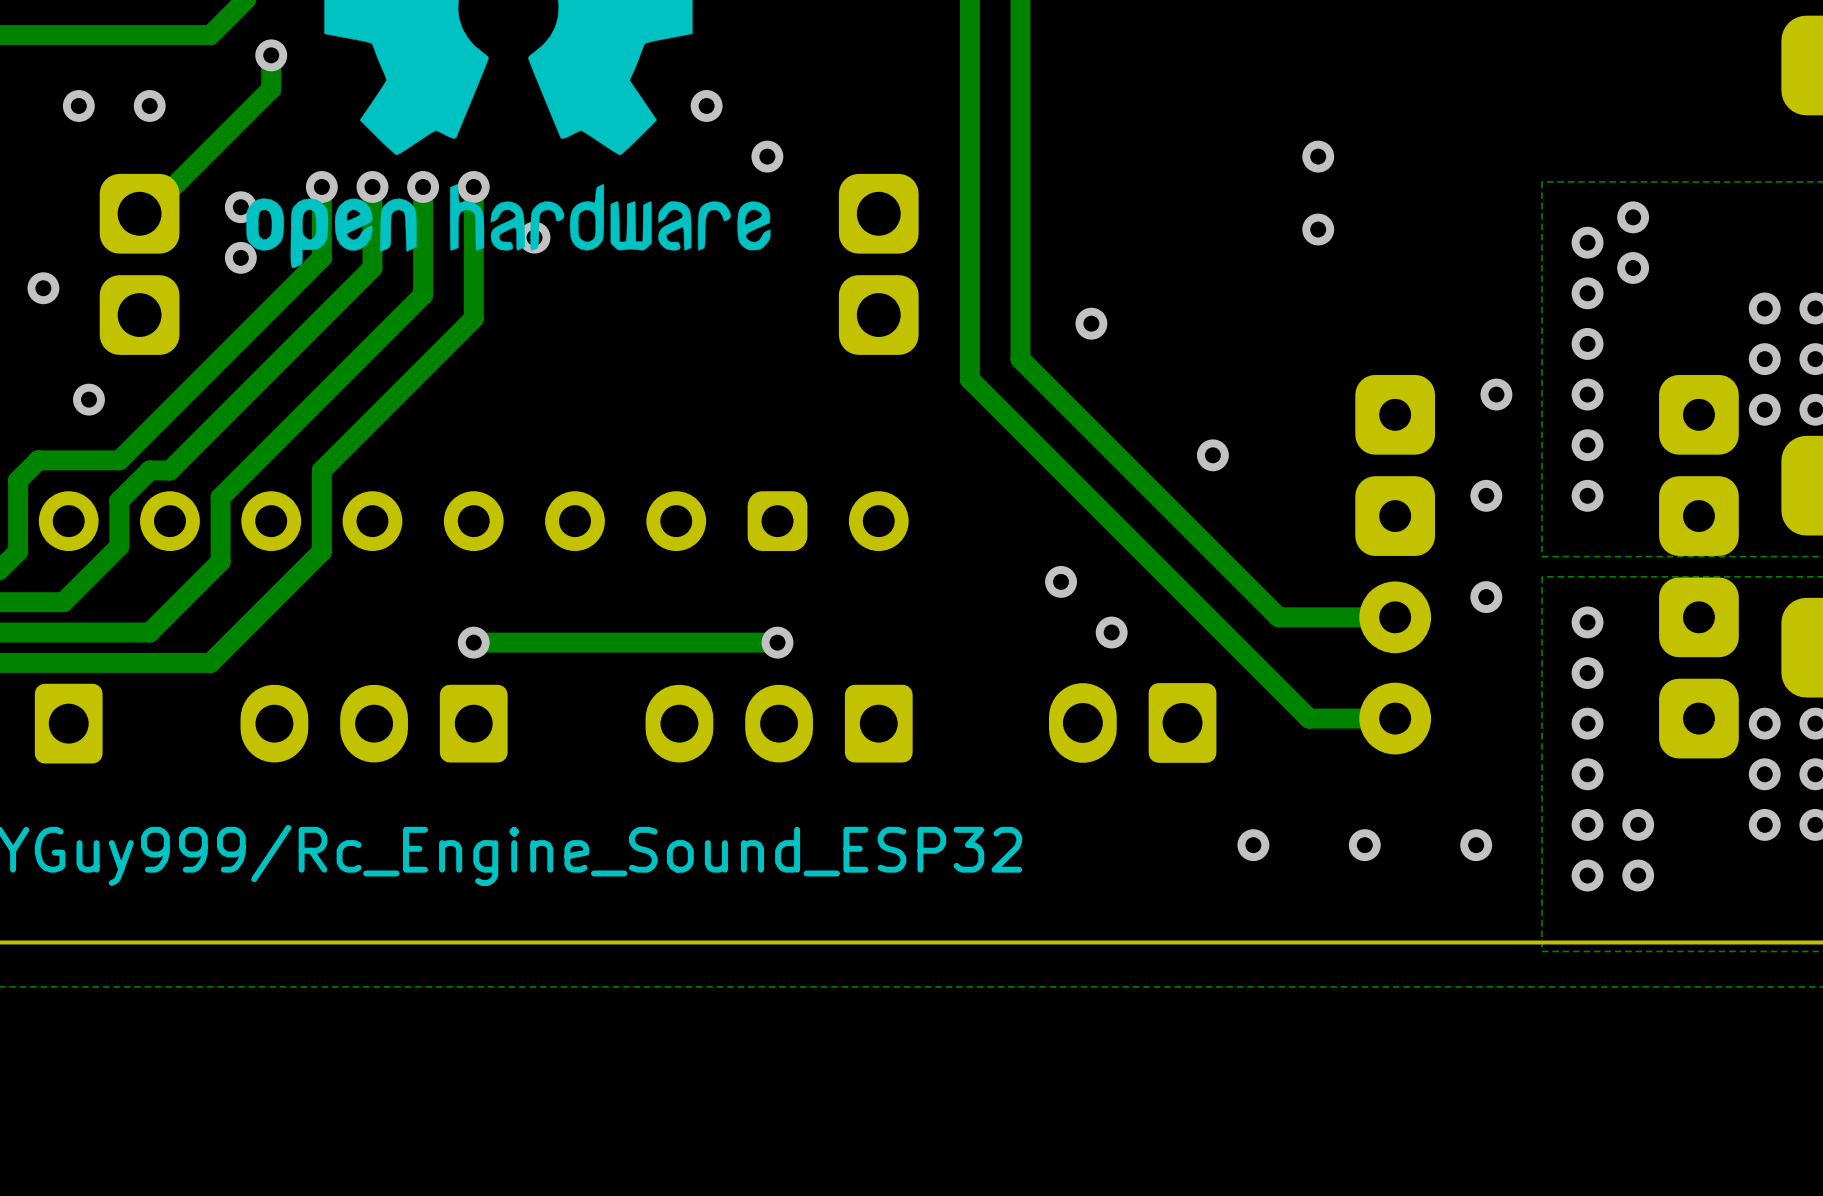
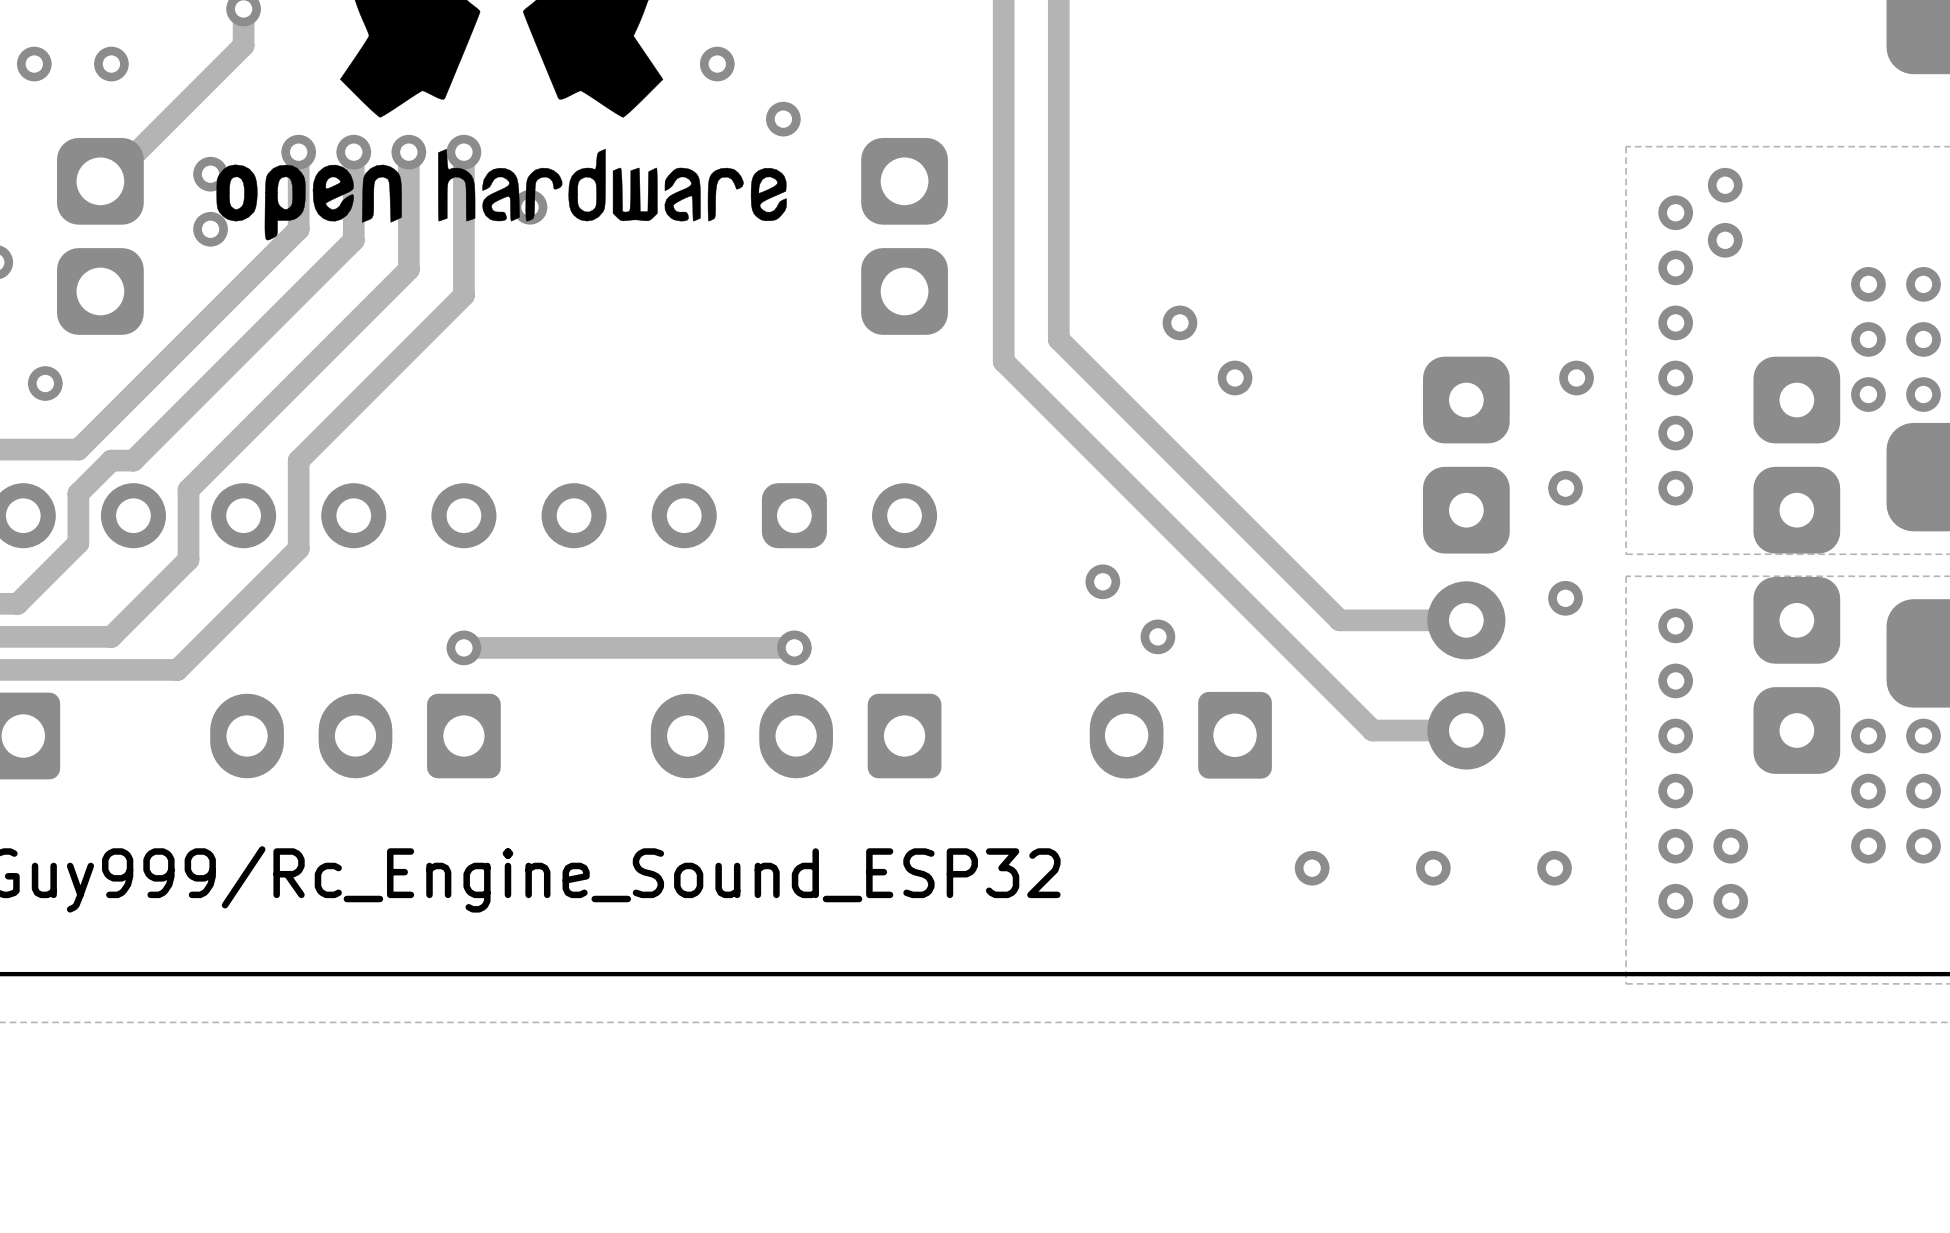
via: (1318, 156) -> none
via: (1318, 229) -> none
via position: (1091, 323) -> (1179, 322)
via: none -> (1235, 378)
via: (1212, 455) -> none

